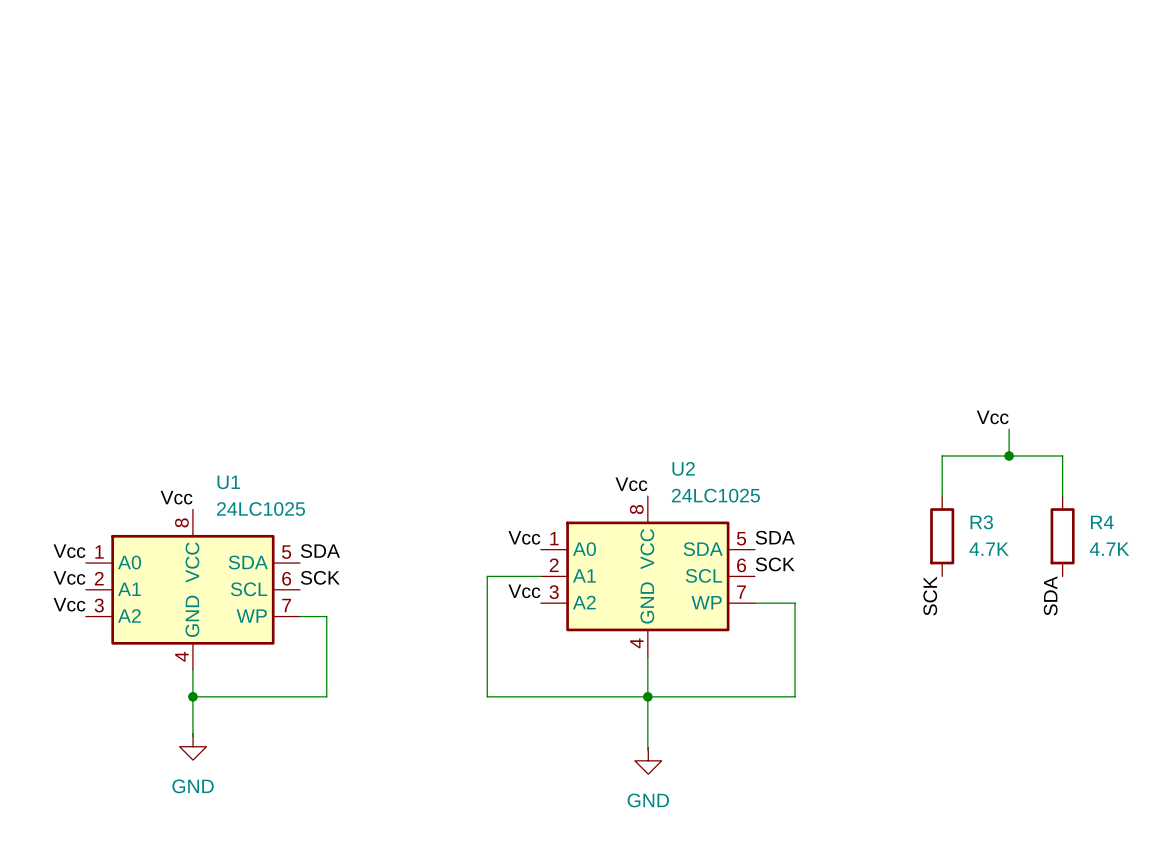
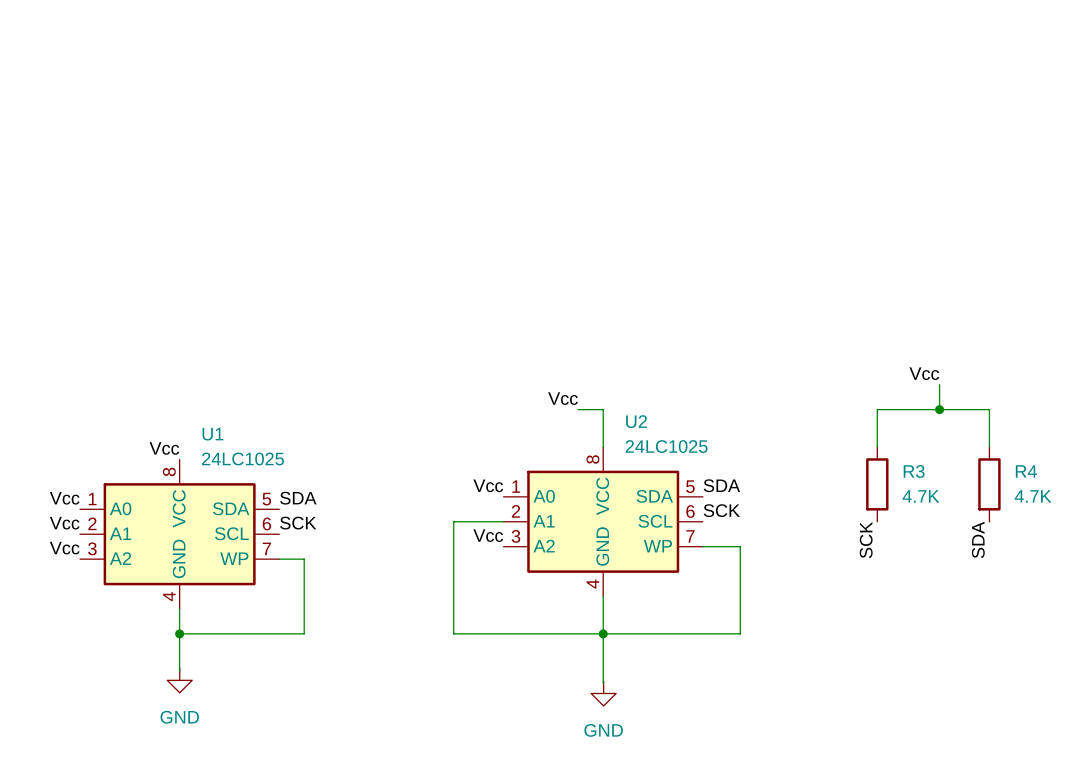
wire: none -> (578, 409) (603, 409) (603, 447)
label position: Vcc (631, 484) -> Vcc (563, 398)

